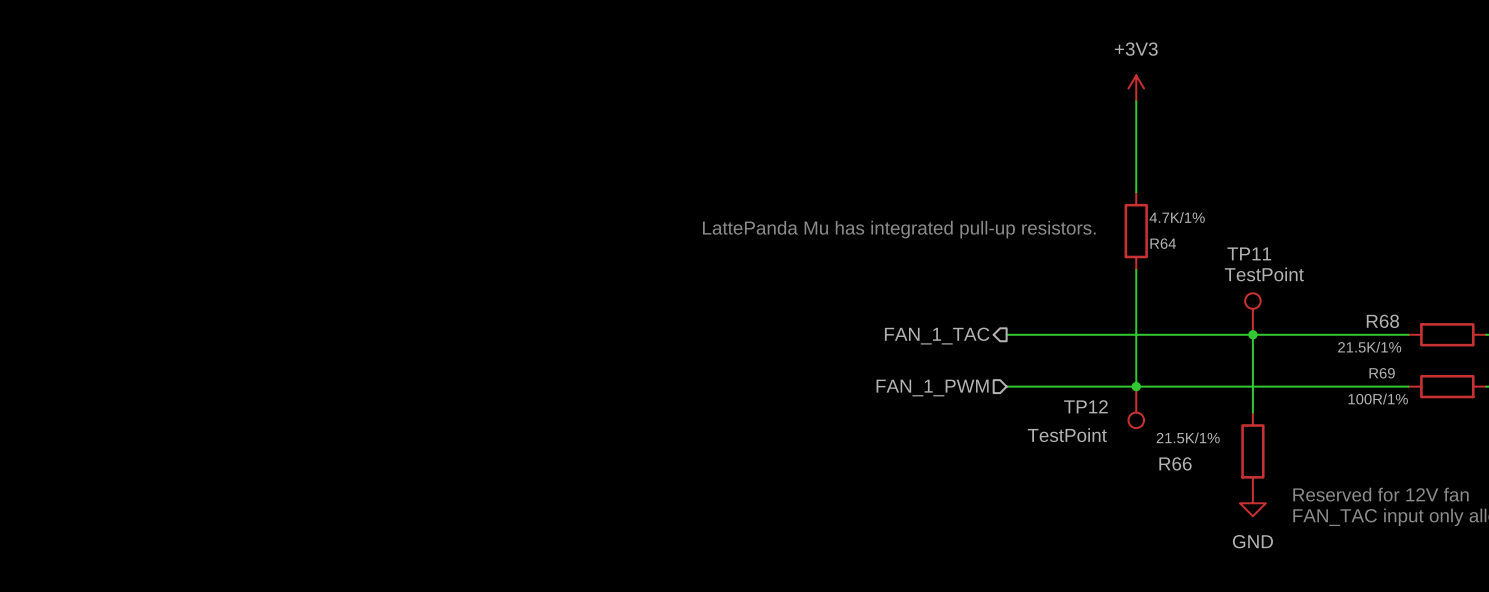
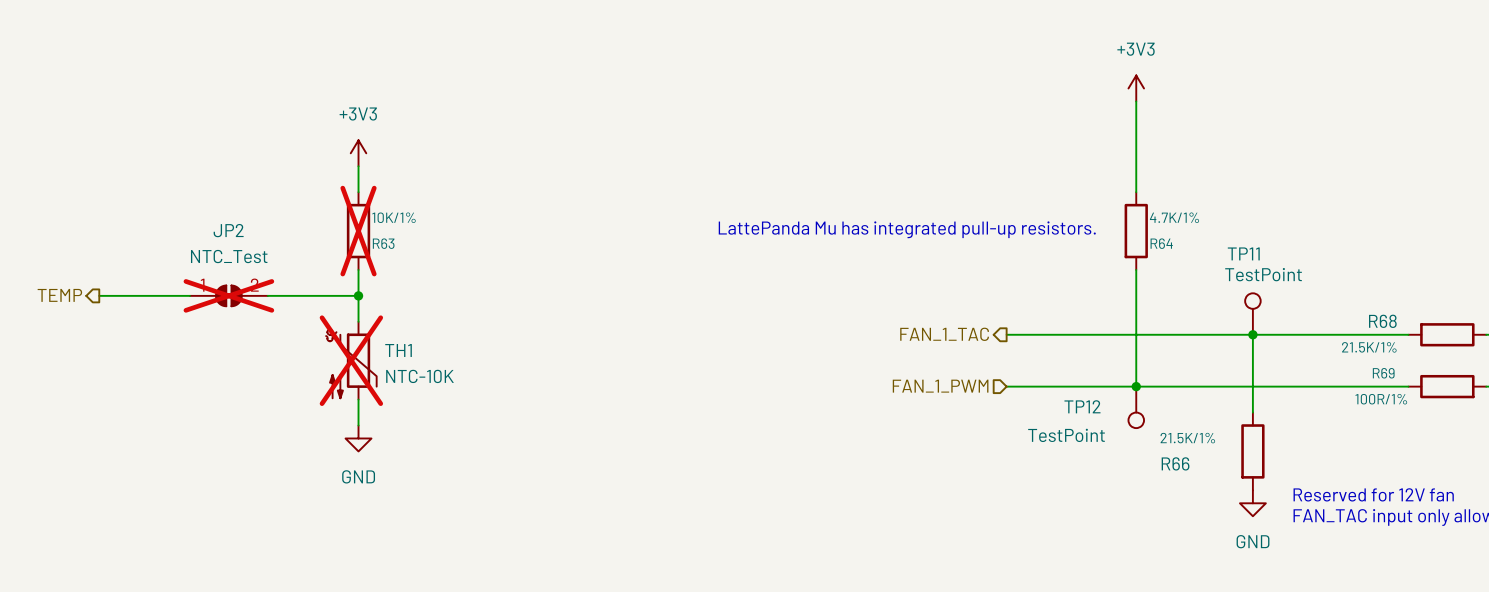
power symbol: none -> +3V3 (358, 153)
wire: none -> (358, 166) (358, 192)
R63: none -> 10K/1% (358, 231)
wire: none -> (358, 269) (358, 321)
hierarchical label: none -> TEMP (59, 295)
wire: none -> (99, 295) (190, 295)
JP2: none -> NTC_Test (228, 295)
wire: none -> (267, 295) (358, 295)
junction: none -> (358, 295)
TH1: none -> NTC-10K (351, 360)
wire: none -> (358, 399) (358, 425)
power symbol: none -> GND (358, 438)

